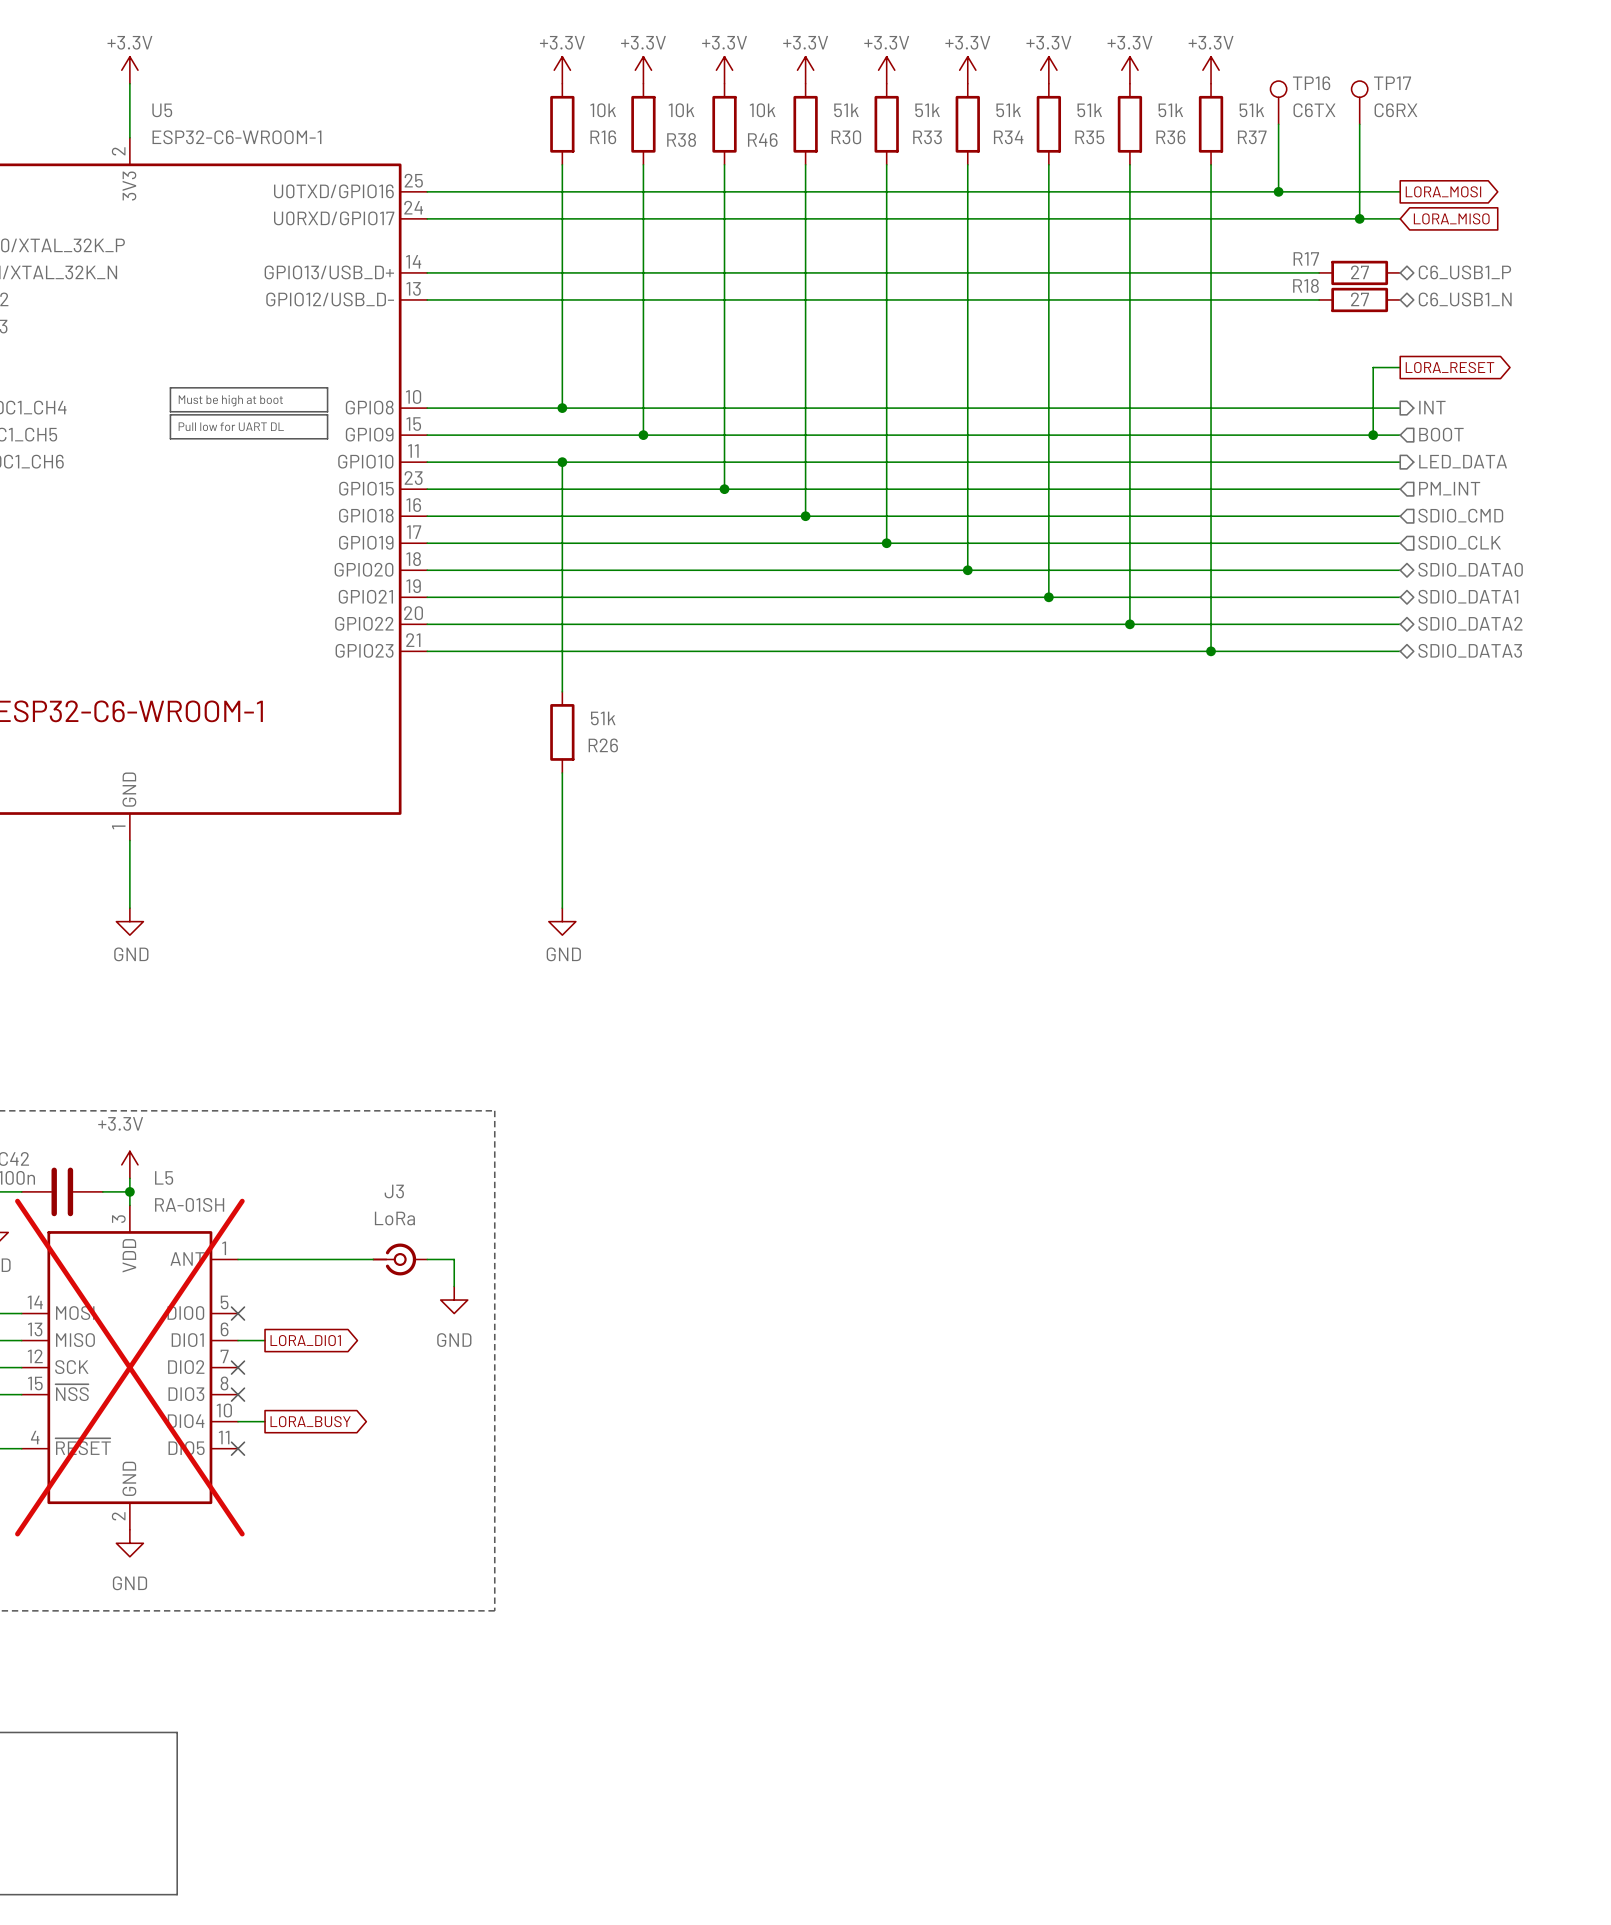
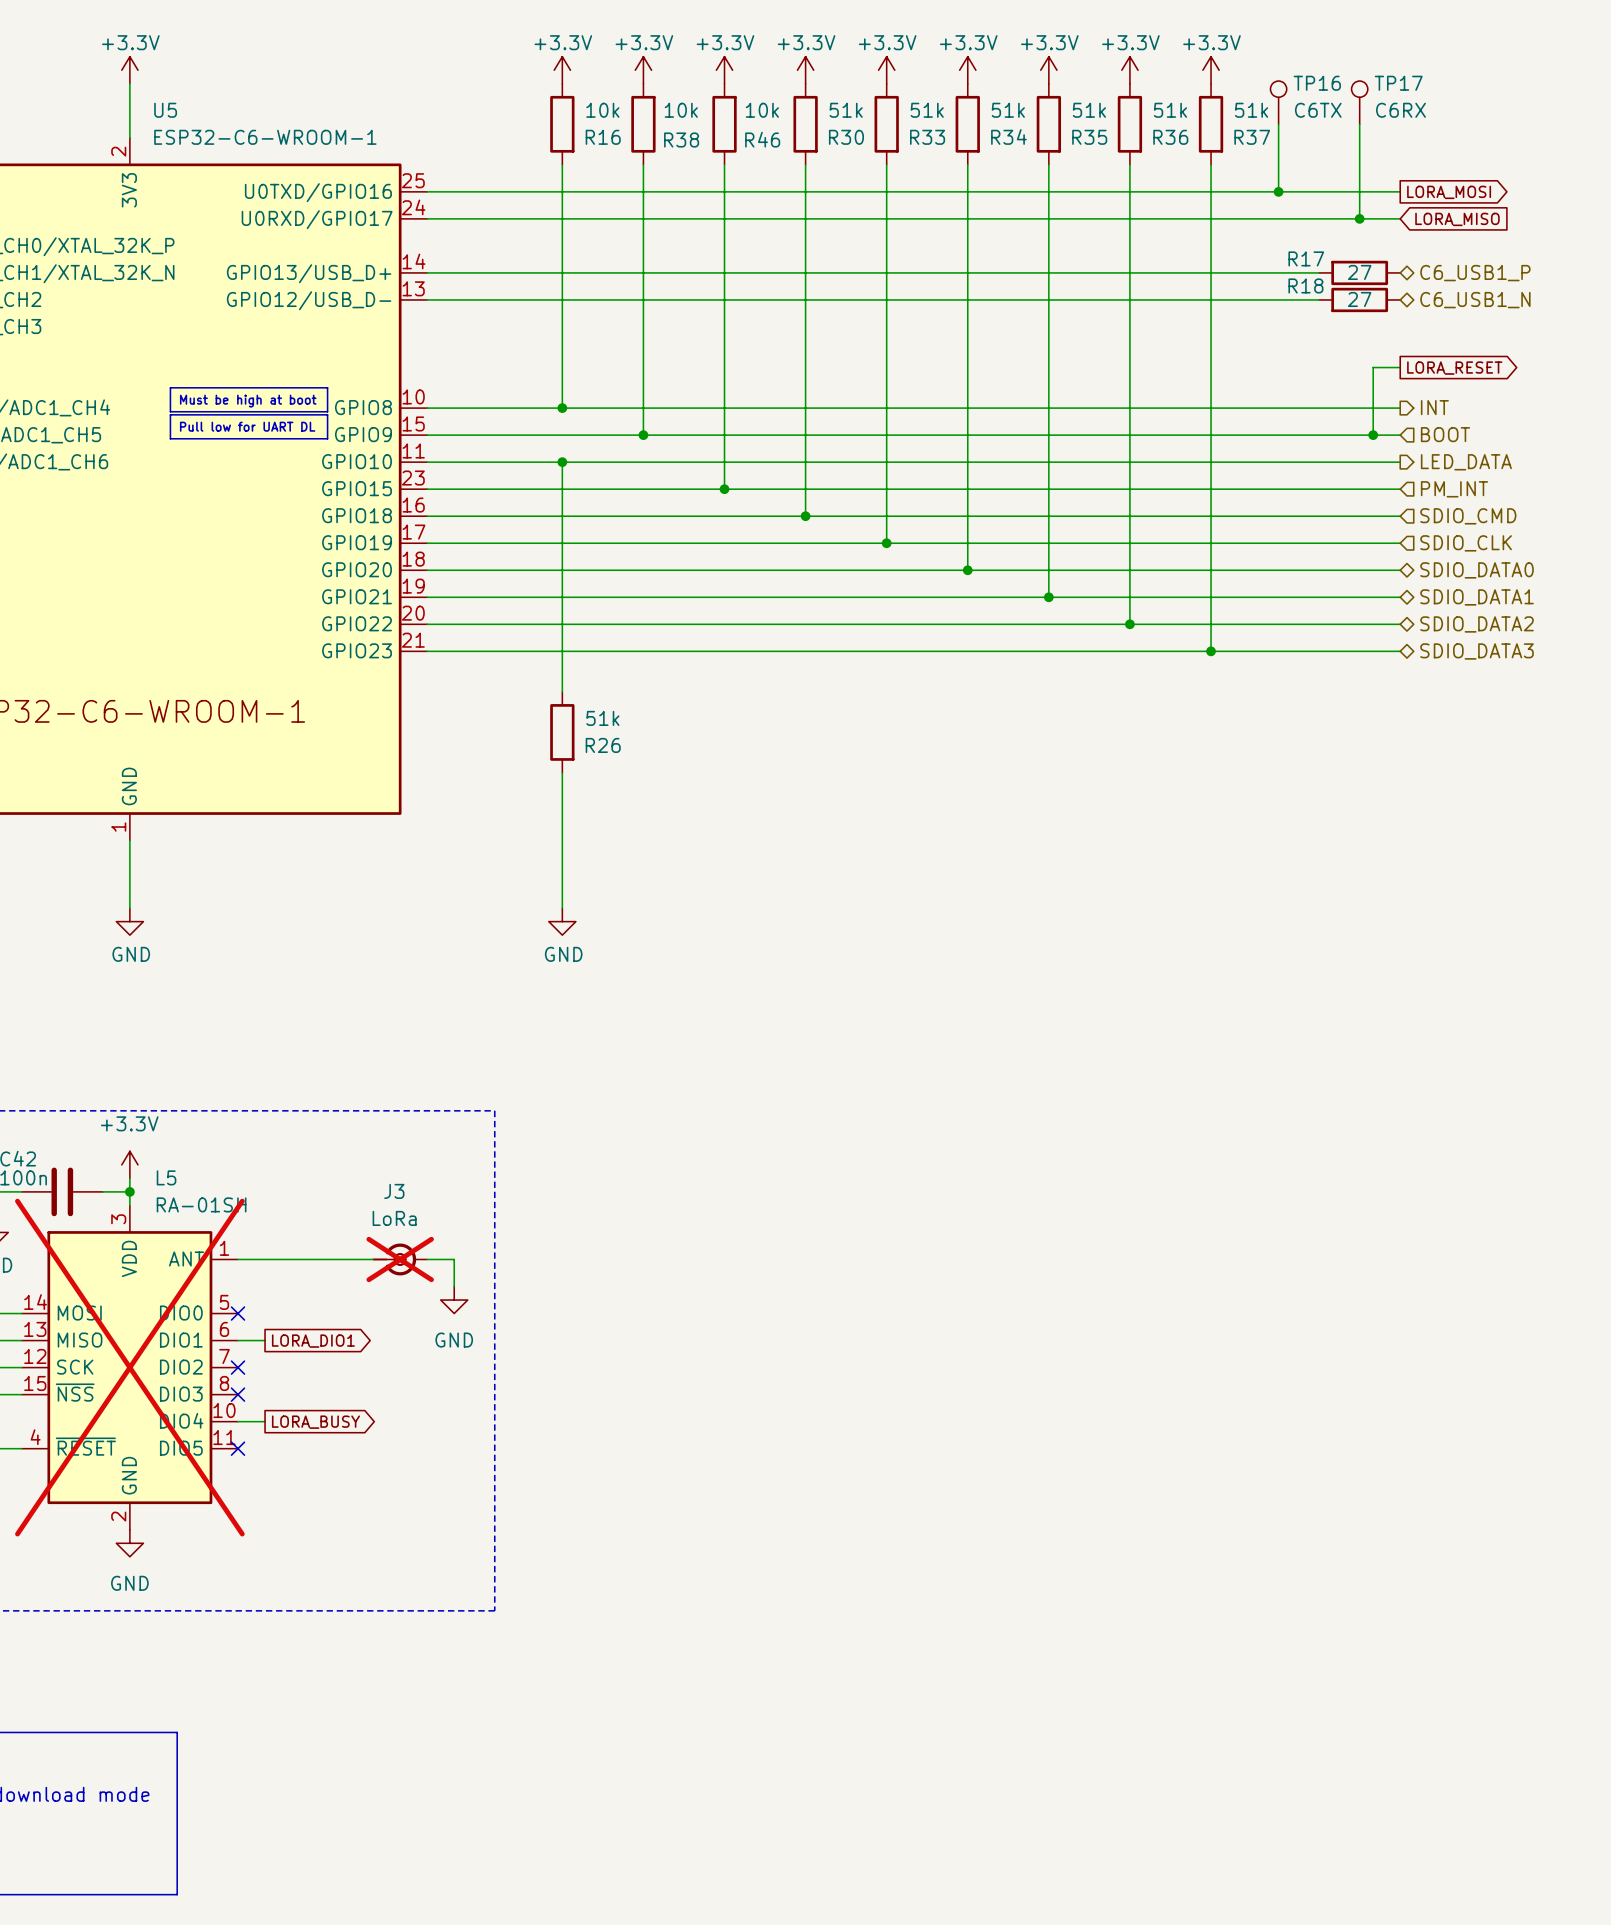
J3 do-not-place cross: none -> (400, 1259)

